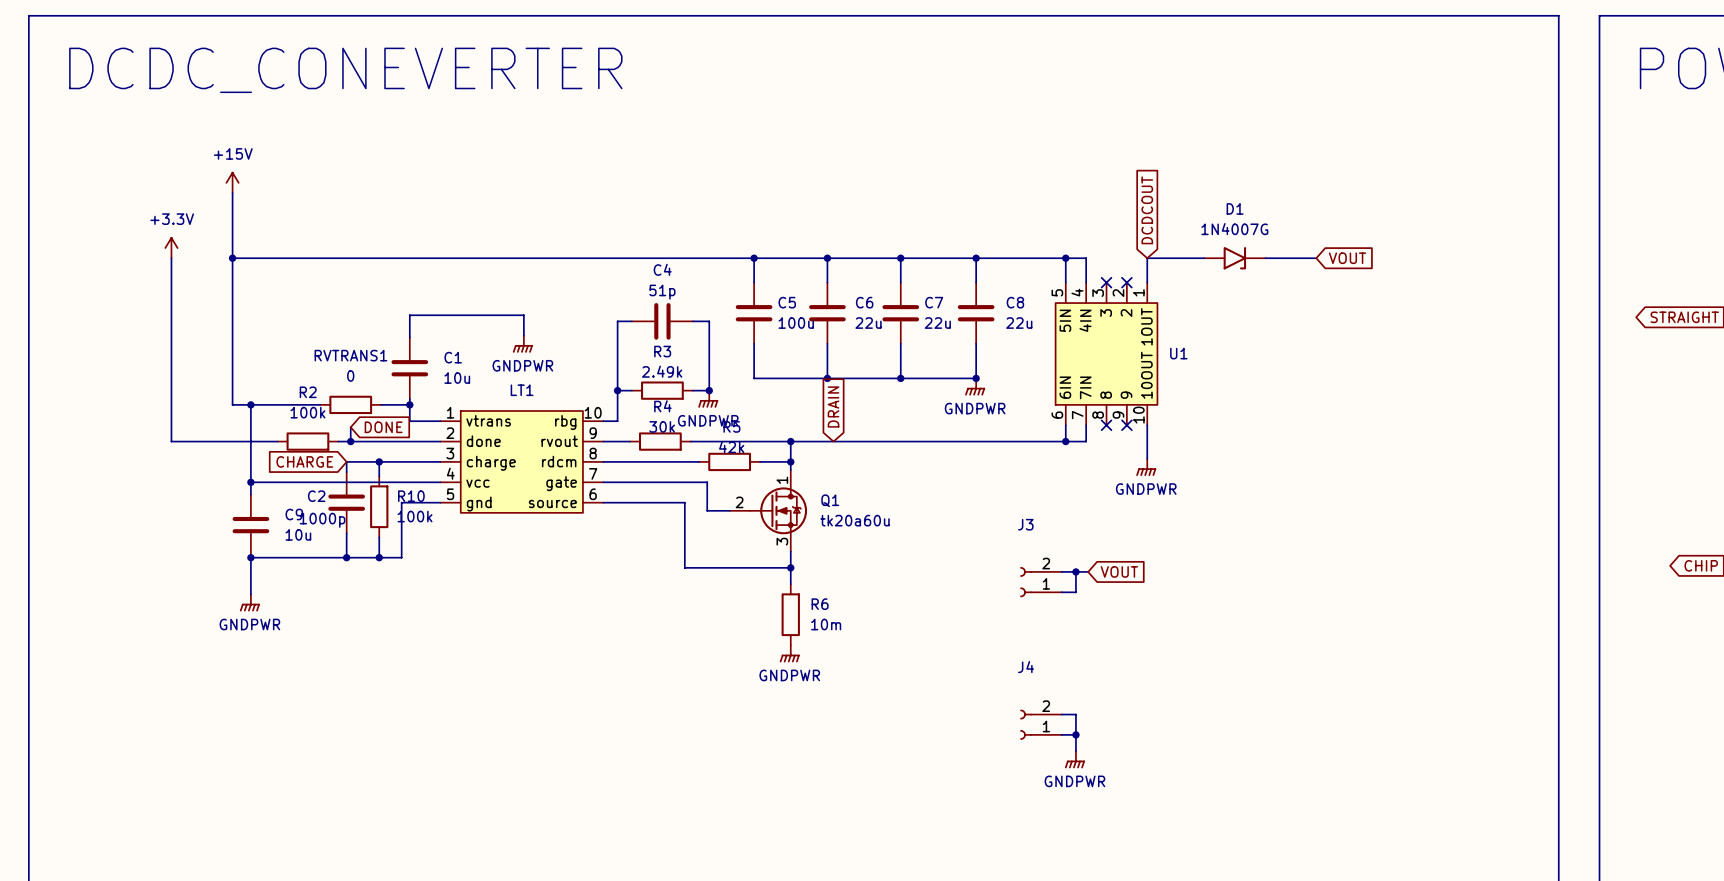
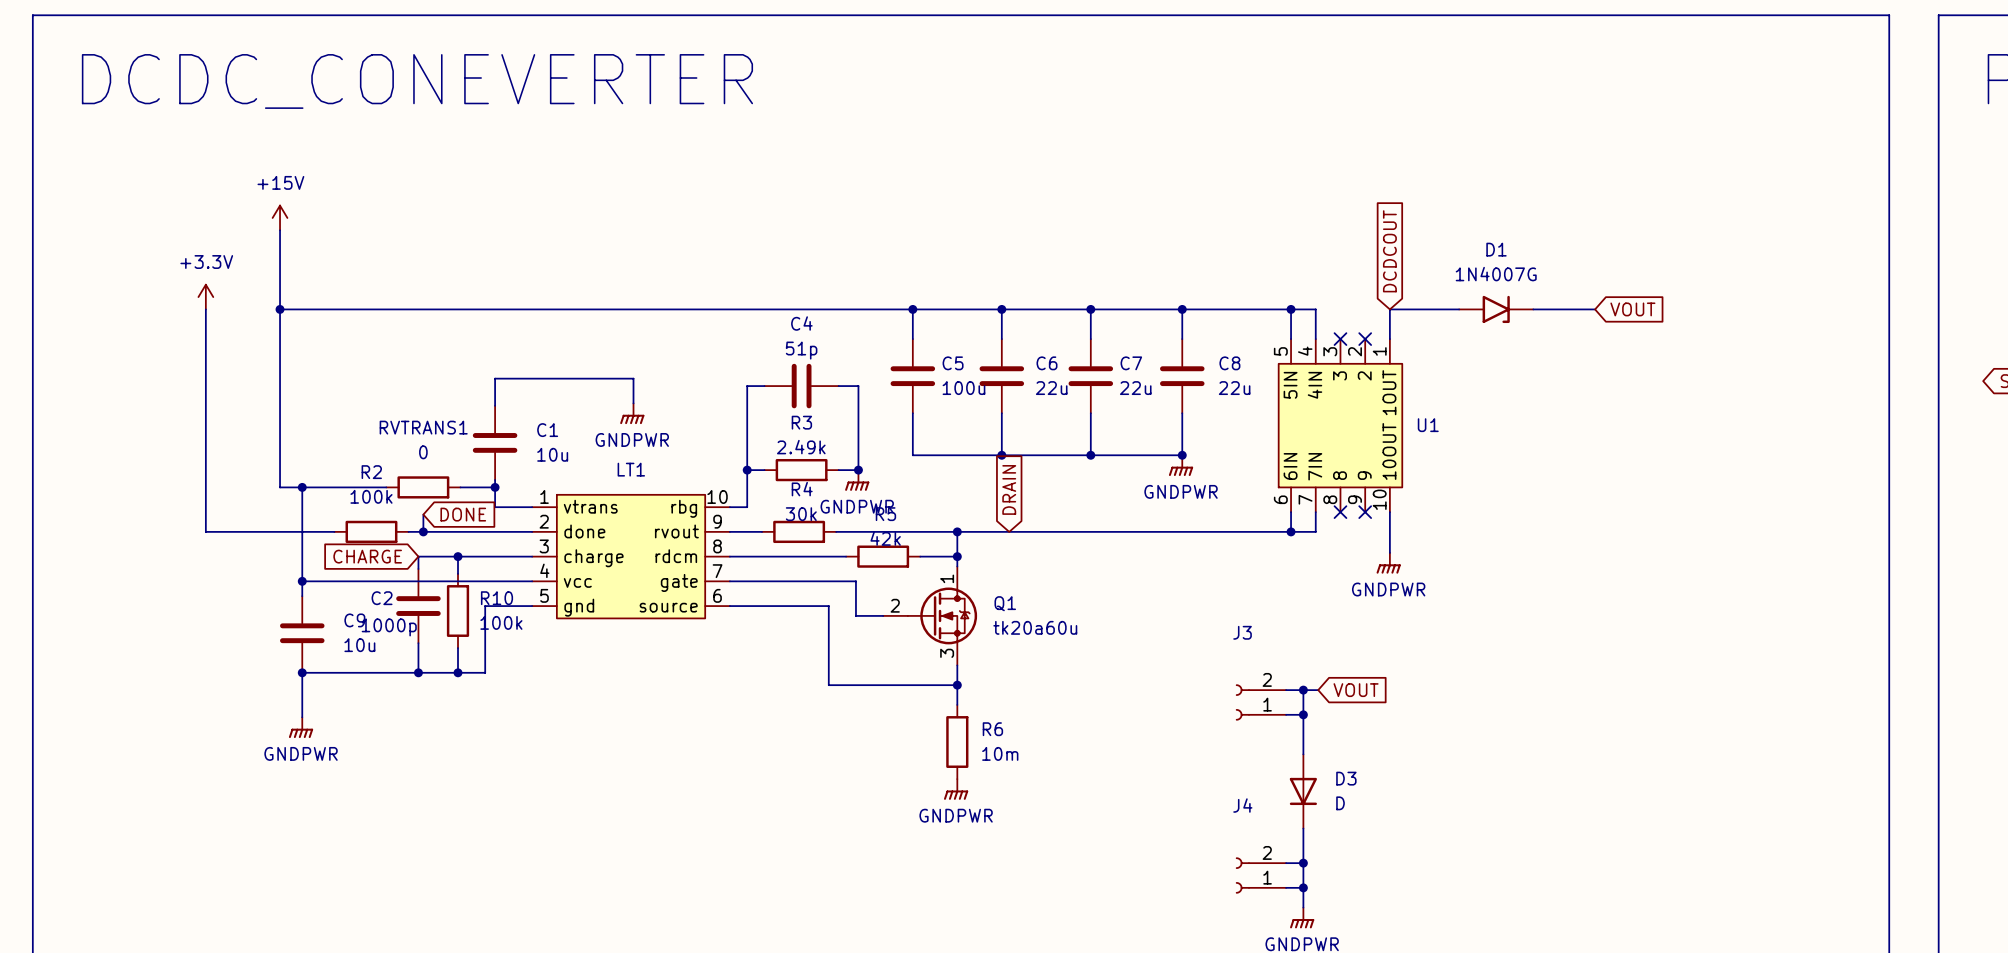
wire: none -> (1303, 714) (1303, 754)
junction: none -> (1303, 714)
D3: none -> D (1303, 791)
wire: none -> (1303, 828) (1303, 863)
junction: none -> (1303, 863)

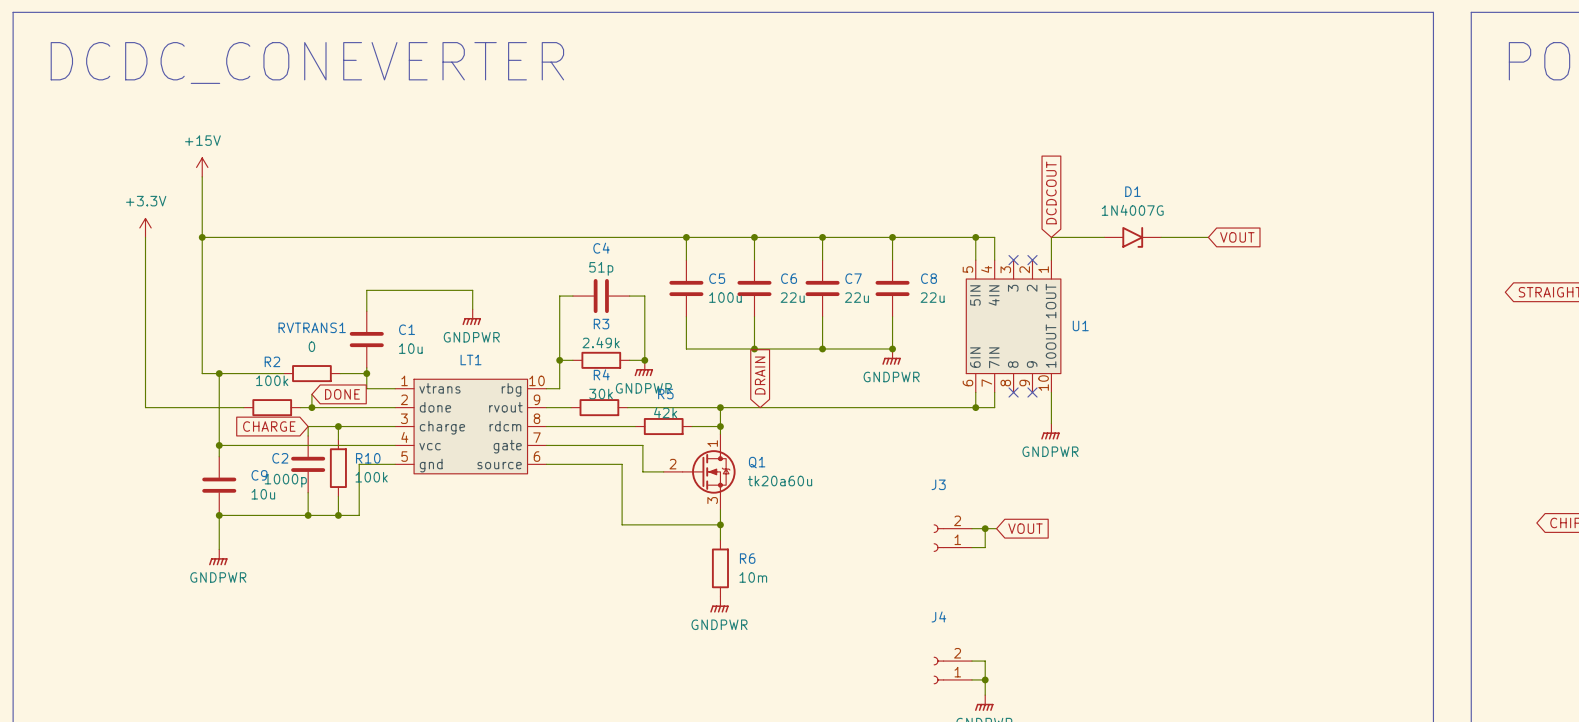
wire: (1303, 714) (1303, 754) -> none
junction: (1303, 714) -> none
D3: D (1303, 791) -> none
wire: (1303, 828) (1303, 863) -> none
junction: (1303, 863) -> none

